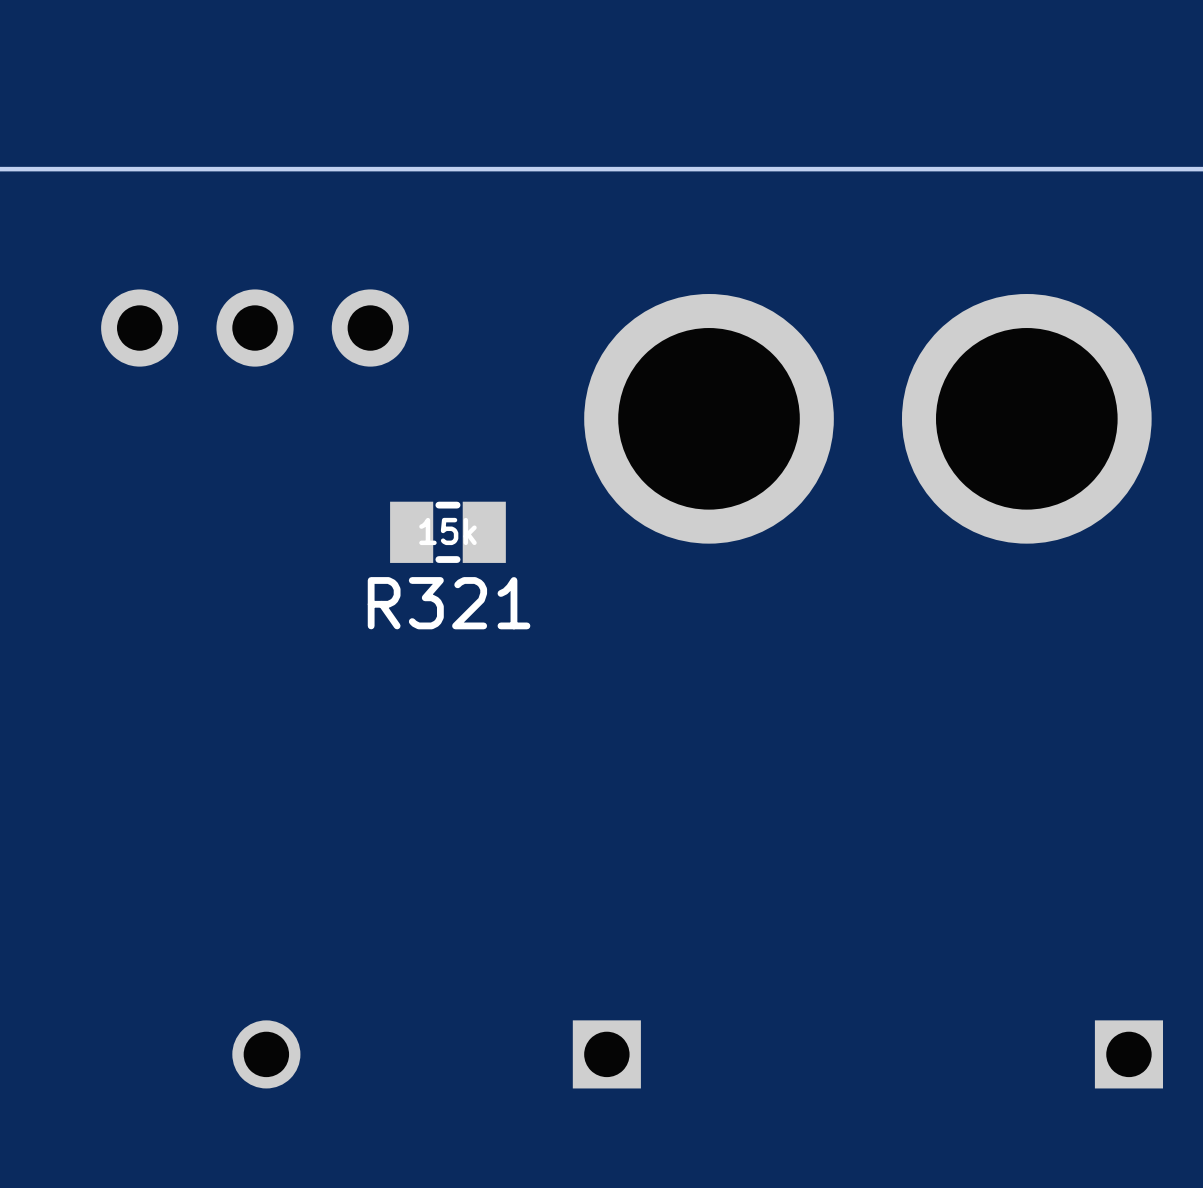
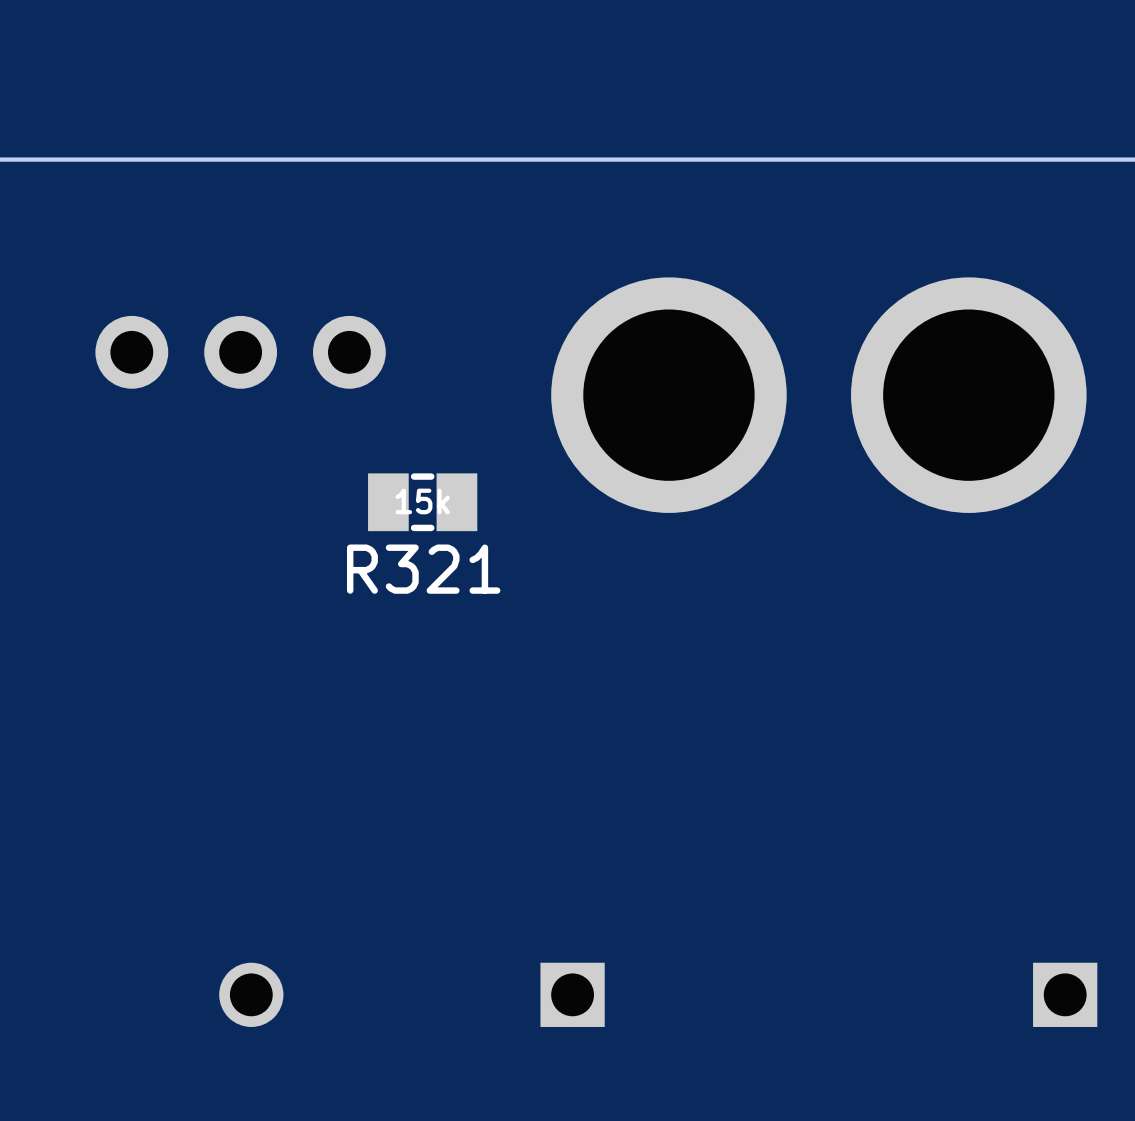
part position: (255, 328) -> (240, 352)

